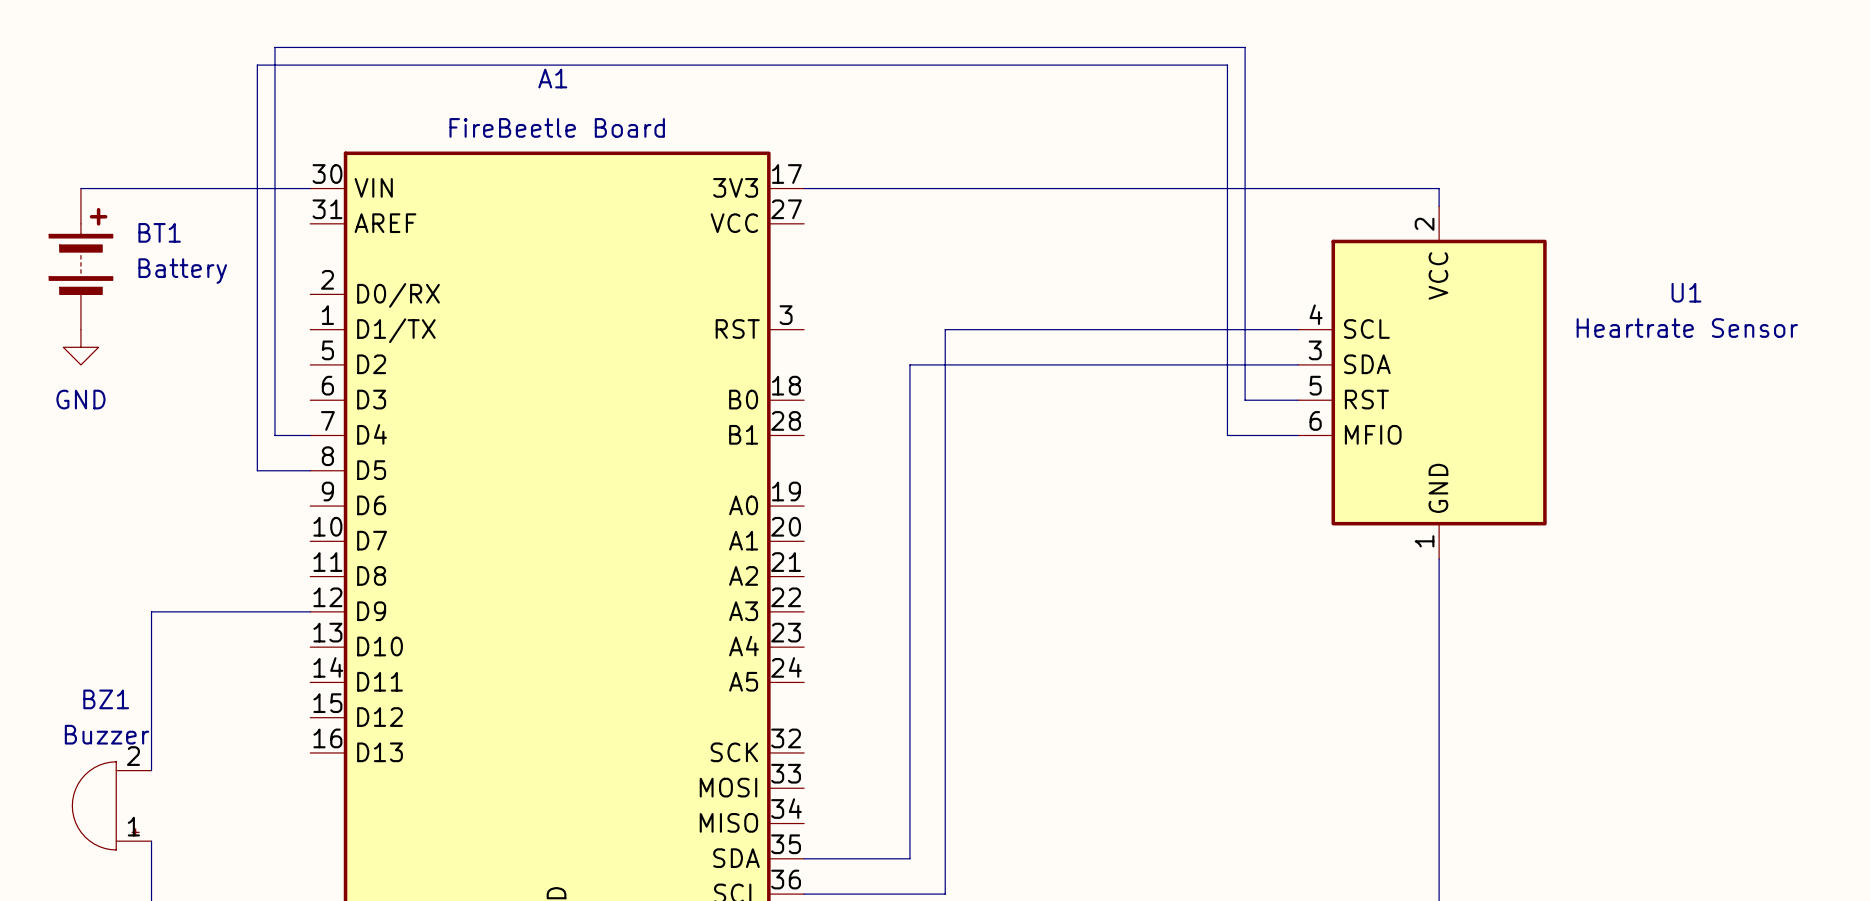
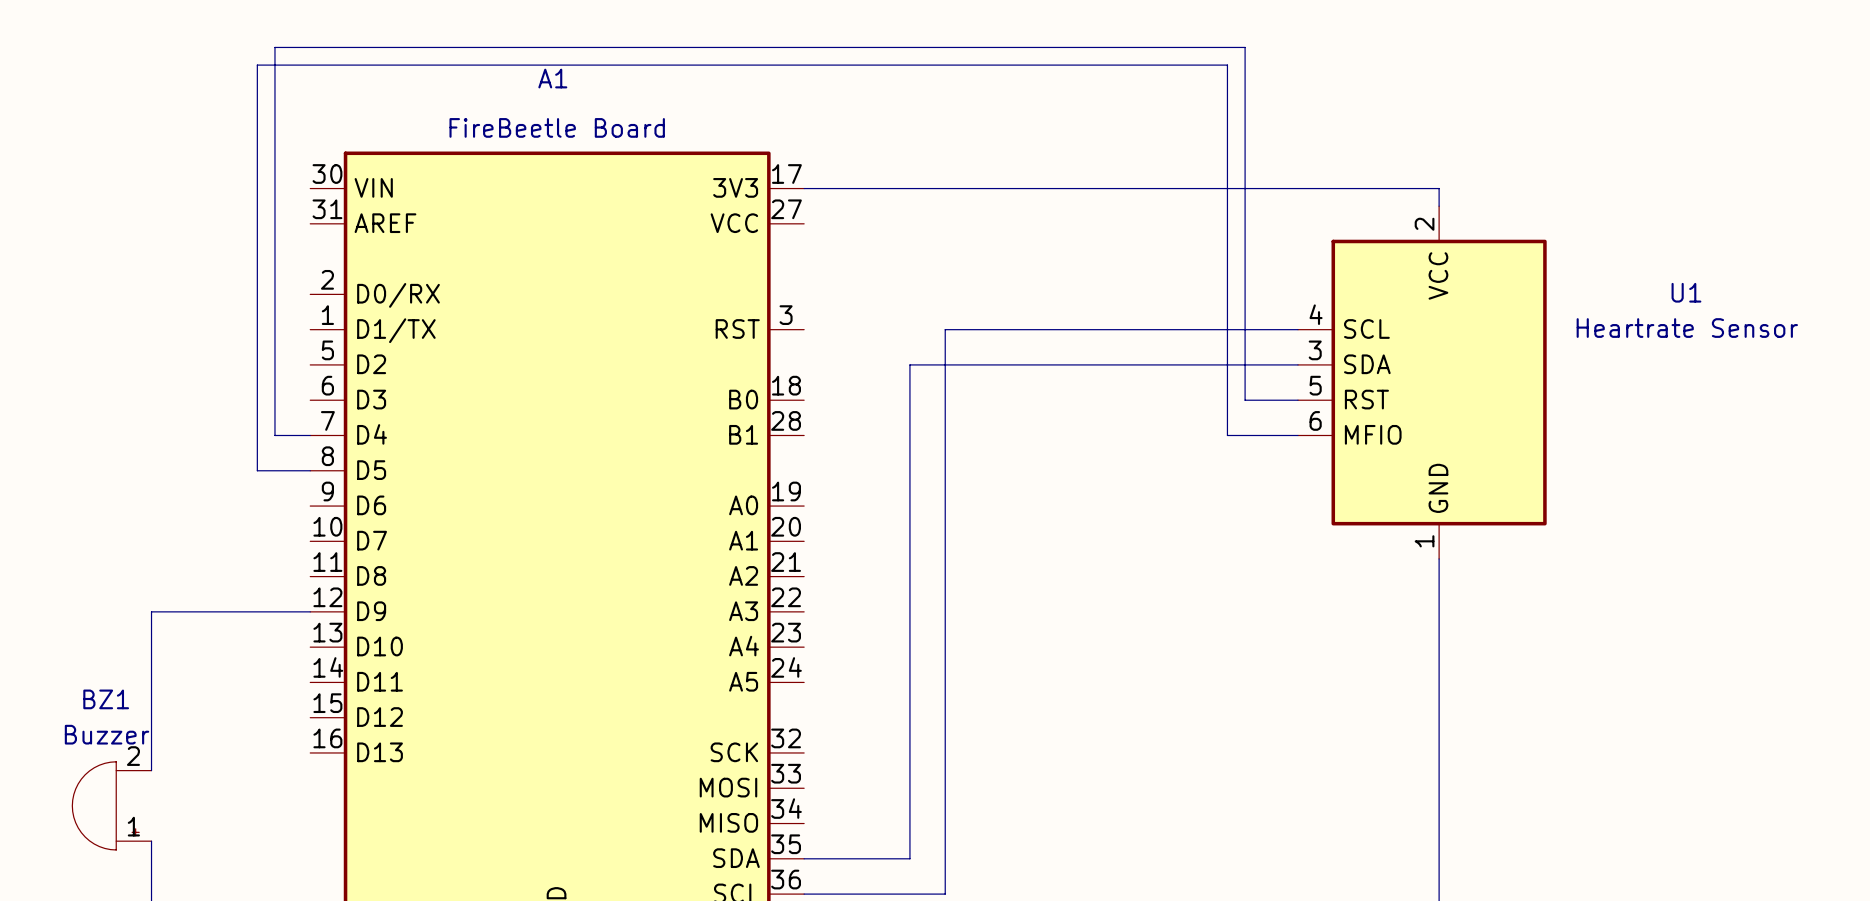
wire: (80, 188) (310, 188) -> none
BT1: Battery (80, 259) -> none
power symbol: GND (80, 347) -> none

